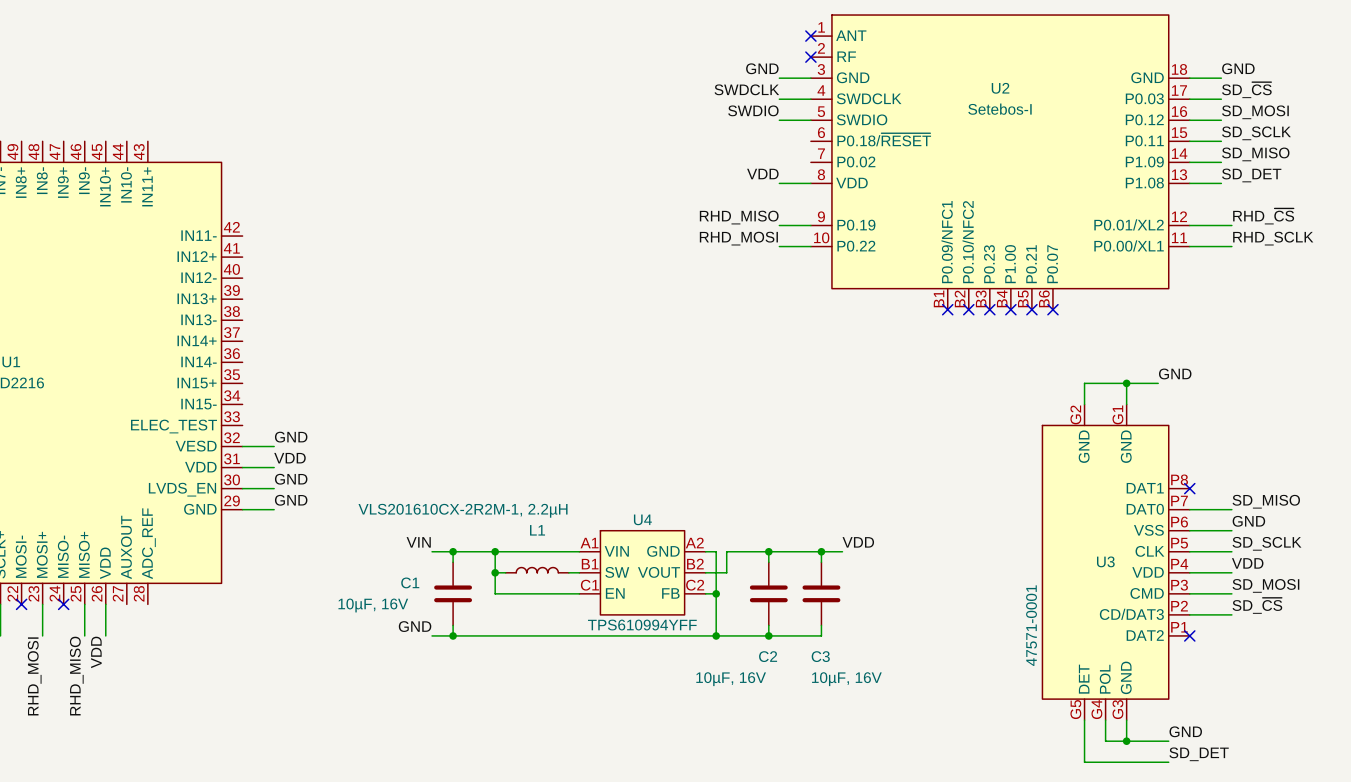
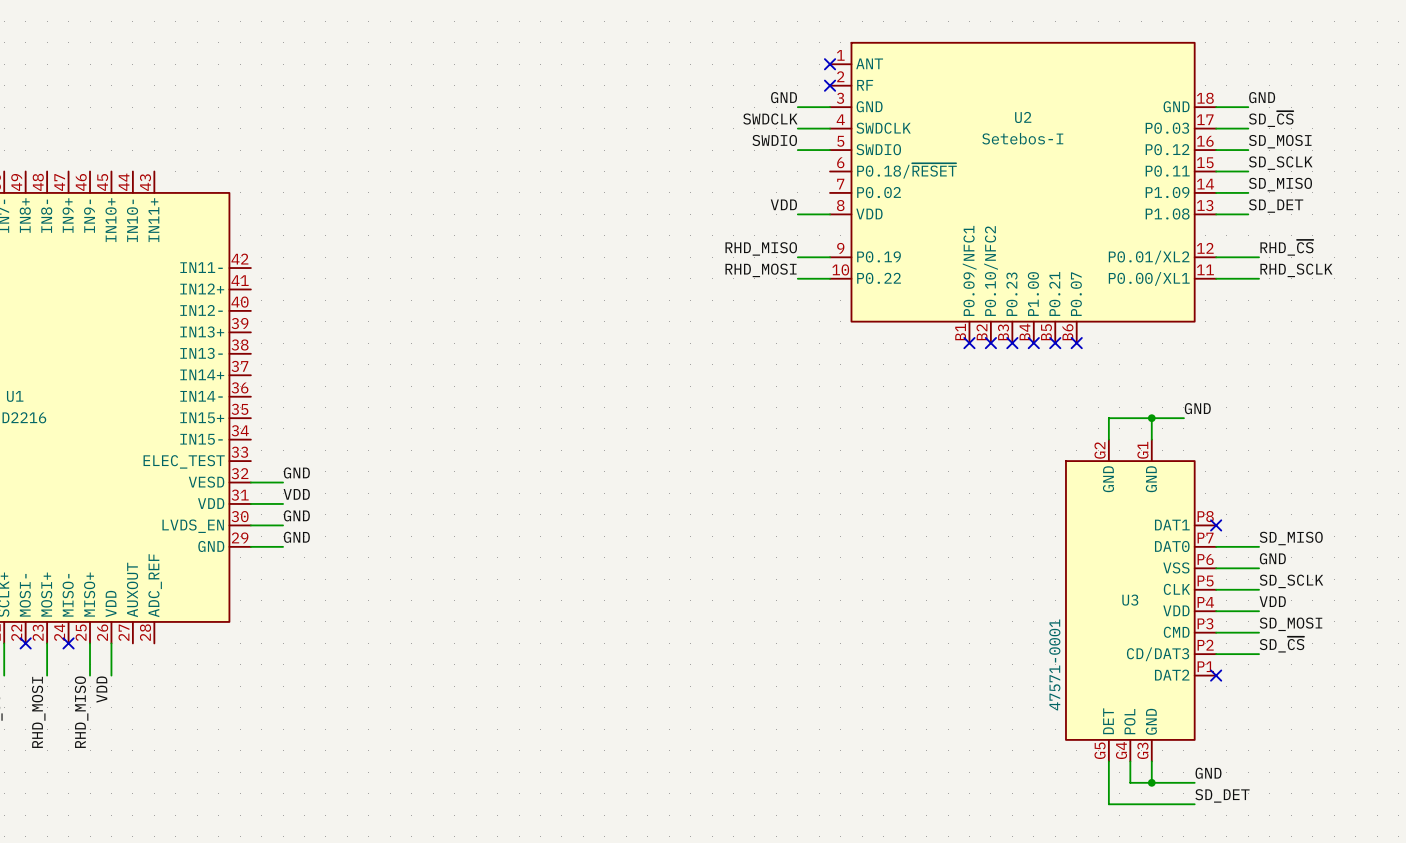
label: VIN (418, 542) -> none
label: VDD (858, 542) -> none
wire: (432, 551) (579, 551) -> none
wire: (453, 551) (453, 562) -> none
junction: (453, 551) -> none
wire: (495, 551) (495, 593) (579, 593) -> none
junction: (495, 551) -> none
wire: (705, 551) (716, 551) (716, 635) -> none
wire: (768, 551) (768, 562) -> none
junction: (768, 551) -> none
wire: (821, 551) (821, 562) -> none
junction: (821, 551) -> none
wire: (842, 551) (726, 551) (726, 572) (705, 572) -> none
L1: VLS201610CX-2R2M-1, 2.2µH (537, 570) -> none
wire: (495, 572) (505, 572) -> none
junction: (495, 572) -> none
wire: (568, 572) (579, 572) -> none
U4: TPS610994YFF (642, 572) -> none
C1: 10µF, 16V (453, 593) -> none
wire: (705, 593) (716, 593) -> none
junction: (716, 593) -> none
C2: 10µF, 16V (768, 593) -> none
C3: 10µF, 16V (821, 593) -> none
wire: (453, 625) (453, 635) -> none
wire: (768, 625) (768, 635) -> none
wire: (821, 625) (821, 635) (432, 635) -> none
label: GND (415, 626) -> none
junction: (453, 635) -> none
junction: (716, 635) -> none
junction: (768, 635) -> none

